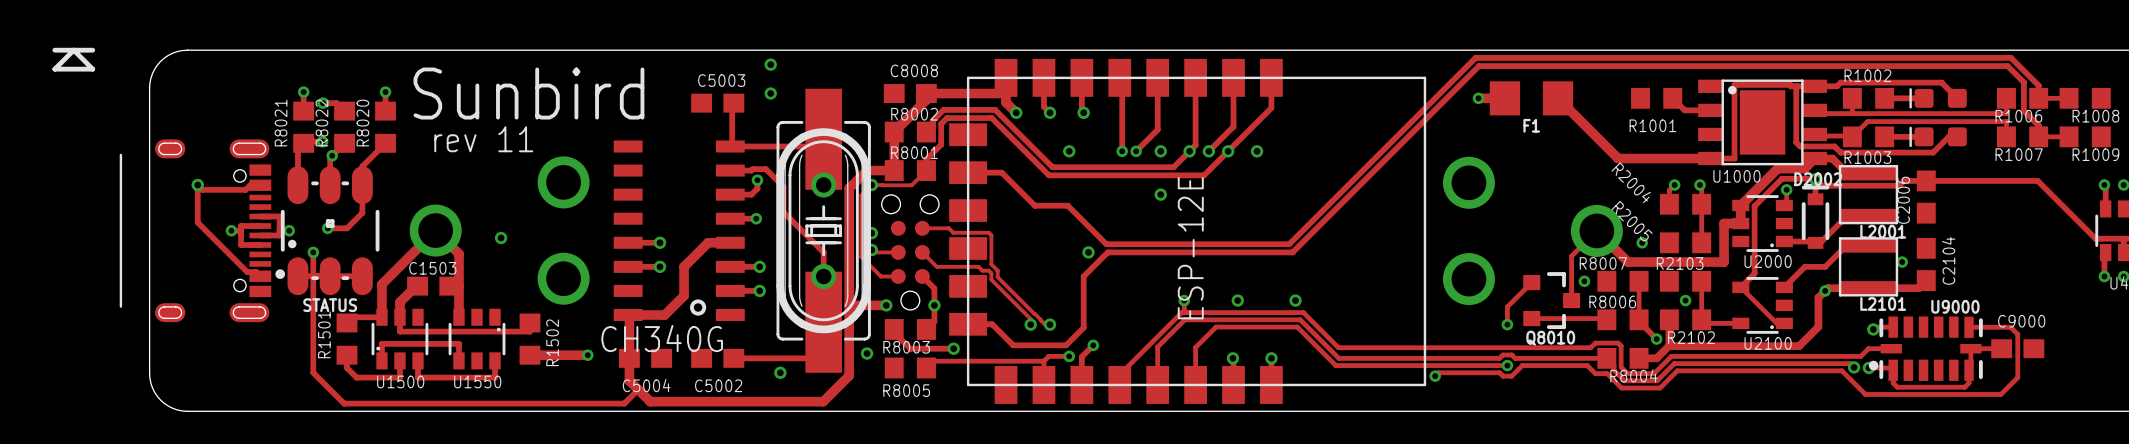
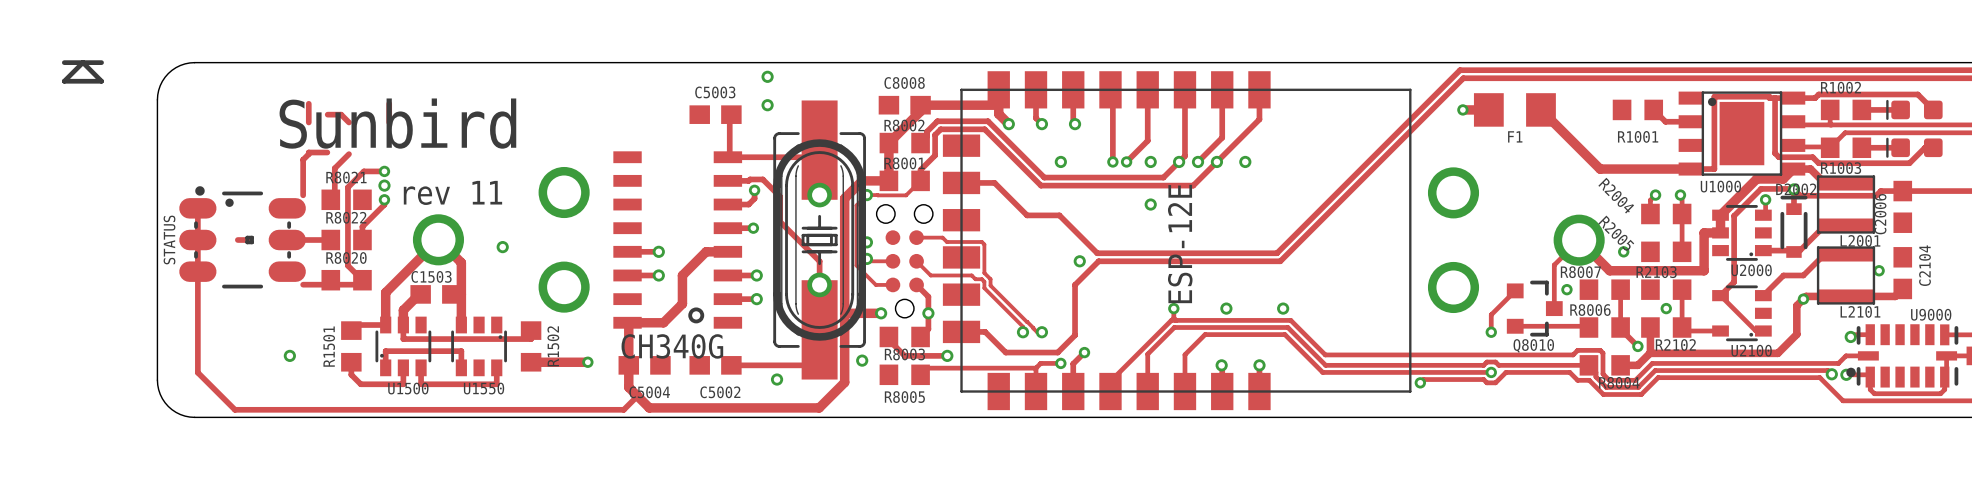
via: (303, 92) -> none
via: (385, 92) -> none
text position: Sunbird (528, 93) -> Sunbird (397, 123)
via: (322, 103) -> none
R8021 rotation: 0° (303, 127) -> 90° clockwise (346, 199)
R8021 position: (303, 127) -> (346, 199)
R8022 rotation: 0° (344, 127) -> 90° clockwise (346, 240)
R8022 position: (344, 127) -> (346, 240)
R8020 rotation: 0° (385, 127) -> 90° clockwise (346, 280)
R8020 position: (385, 127) -> (346, 280)
text position: rev 11 (483, 139) -> rev 11 (452, 192)
via: (322, 141) -> none
track: (385, 143) (362, 166) (362, 212) (347, 228) (327, 228) -> none
via: (332, 155) -> none
track: none -> (384, 171) (363, 171) (347, 187) (347, 265) (362, 280)
via: none -> (384, 171)
via: none -> (384, 185)
via: (197, 185) -> none
track: (260, 185) (250, 185) (245, 189) (202, 189) (197, 185) (197, 222) (247, 272) (256, 272) (260, 276) -> none
track: none -> (384, 199) (384, 204) (362, 226) (362, 240)
via: none -> (384, 199)
track: (260, 216) (279, 216) (279, 235) (260, 235) -> none
track: (260, 226) (241, 226) (241, 244) (260, 244) -> none
via: (327, 228) -> none
part: (195, 230) -> none
via: (231, 230) -> none
track: none -> (294, 240) (330, 240)
via: (289, 230) -> none
STATUS rotation: 0° (327, 230) -> 90° clockwise (242, 237)
STATUS position: (327, 230) -> (242, 237)
track: (313, 252) (313, 372) (344, 403) -> (197, 208) (197, 372) (234, 409) (348, 409)
via: (313, 252) -> none
via: none -> (289, 355)

